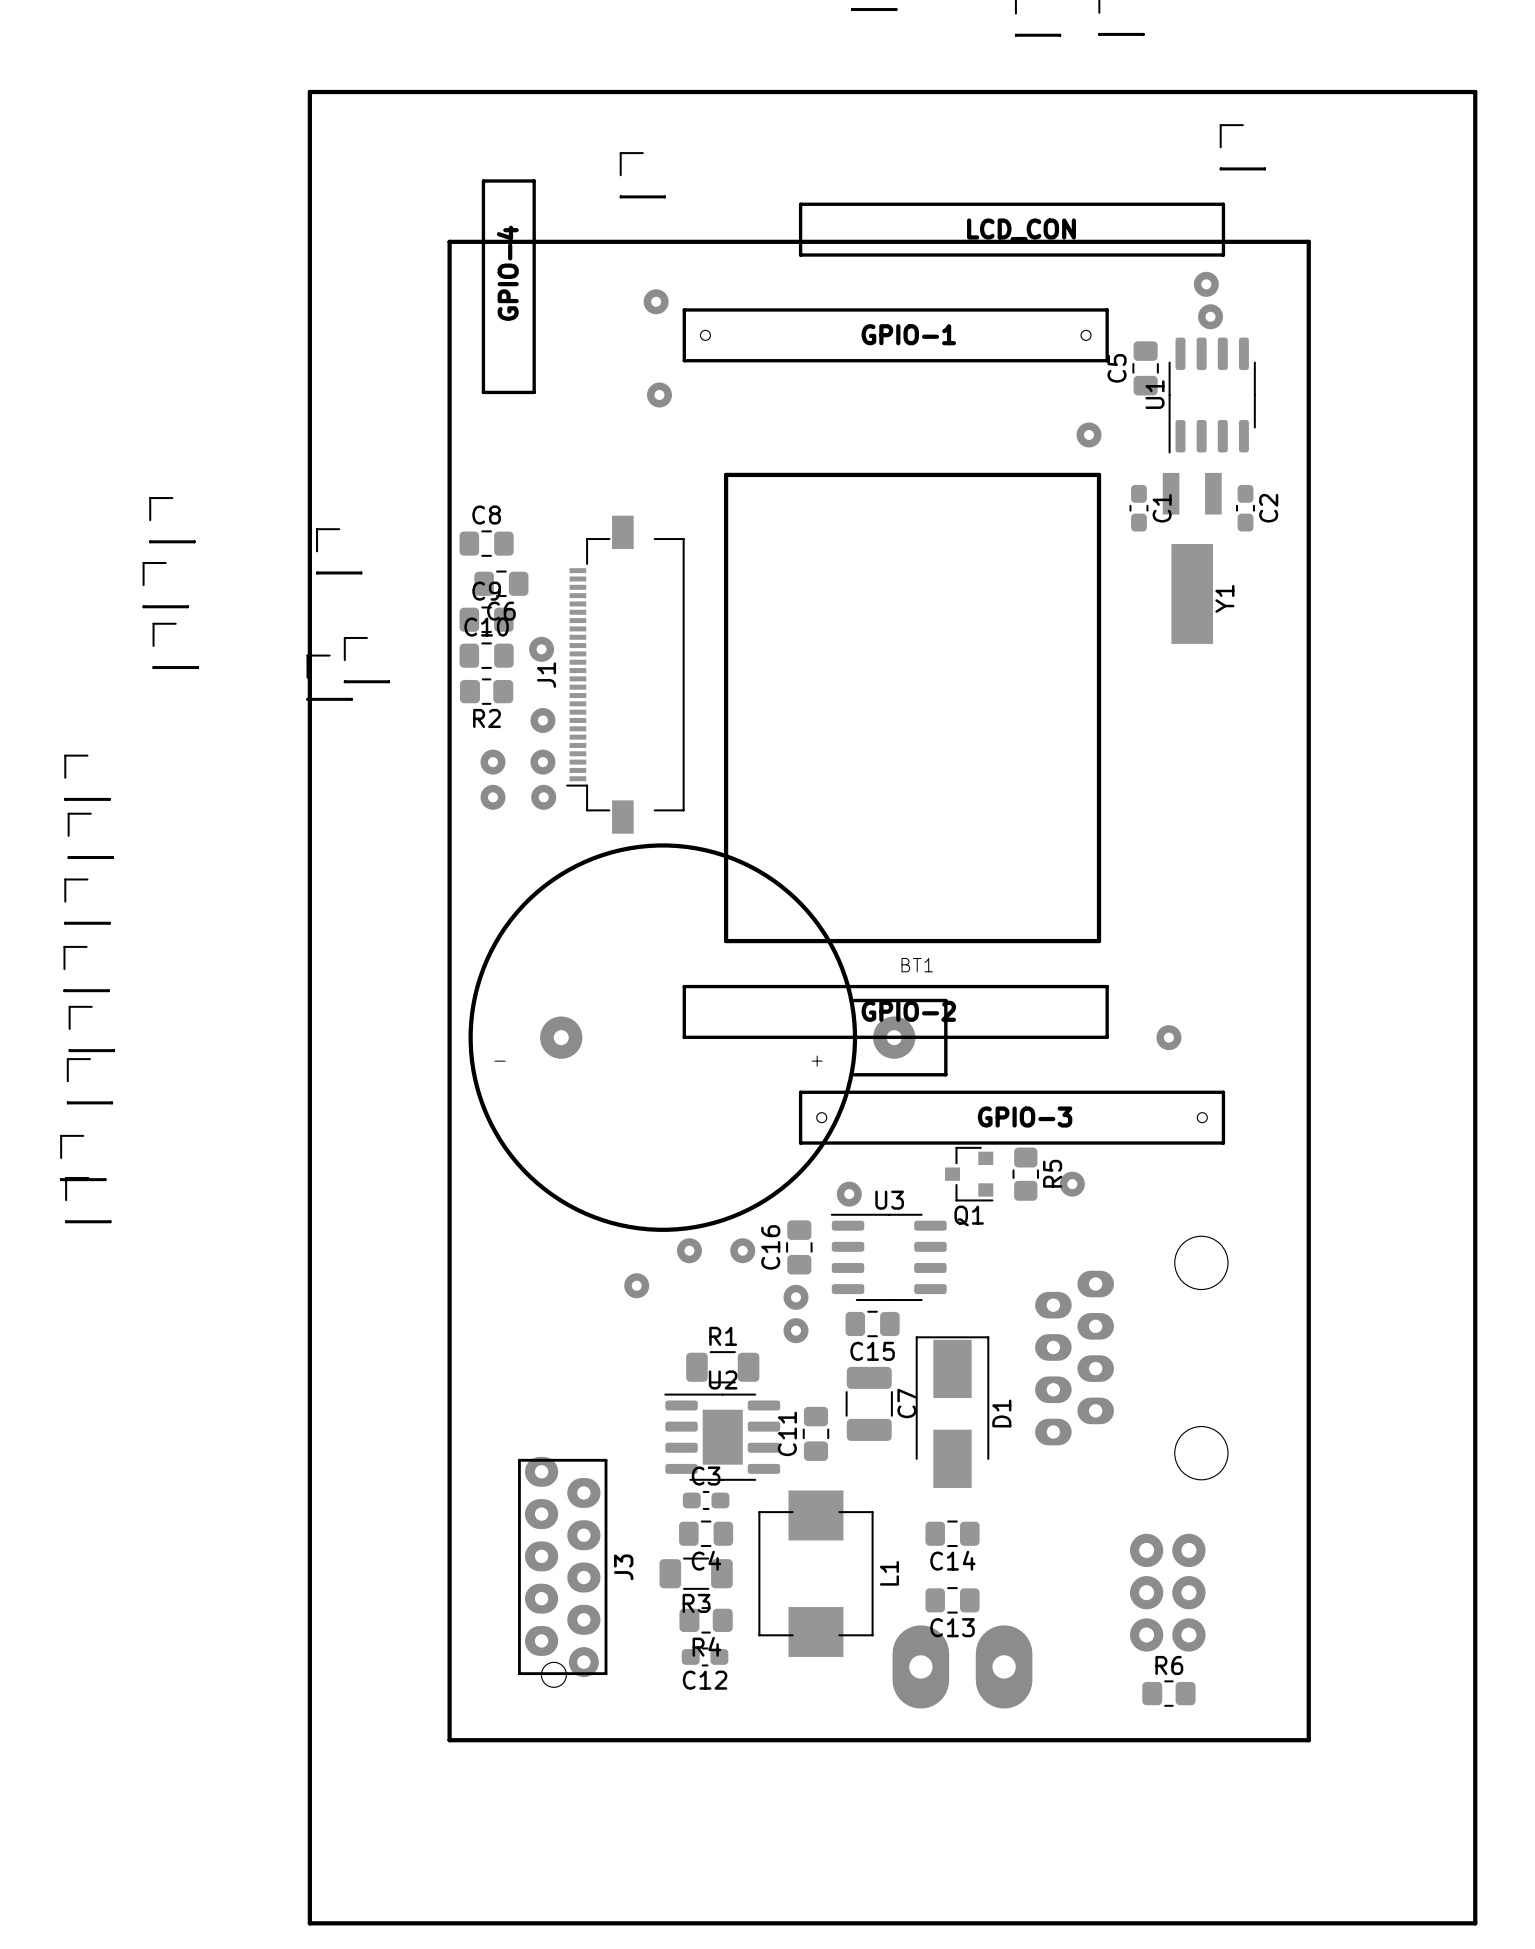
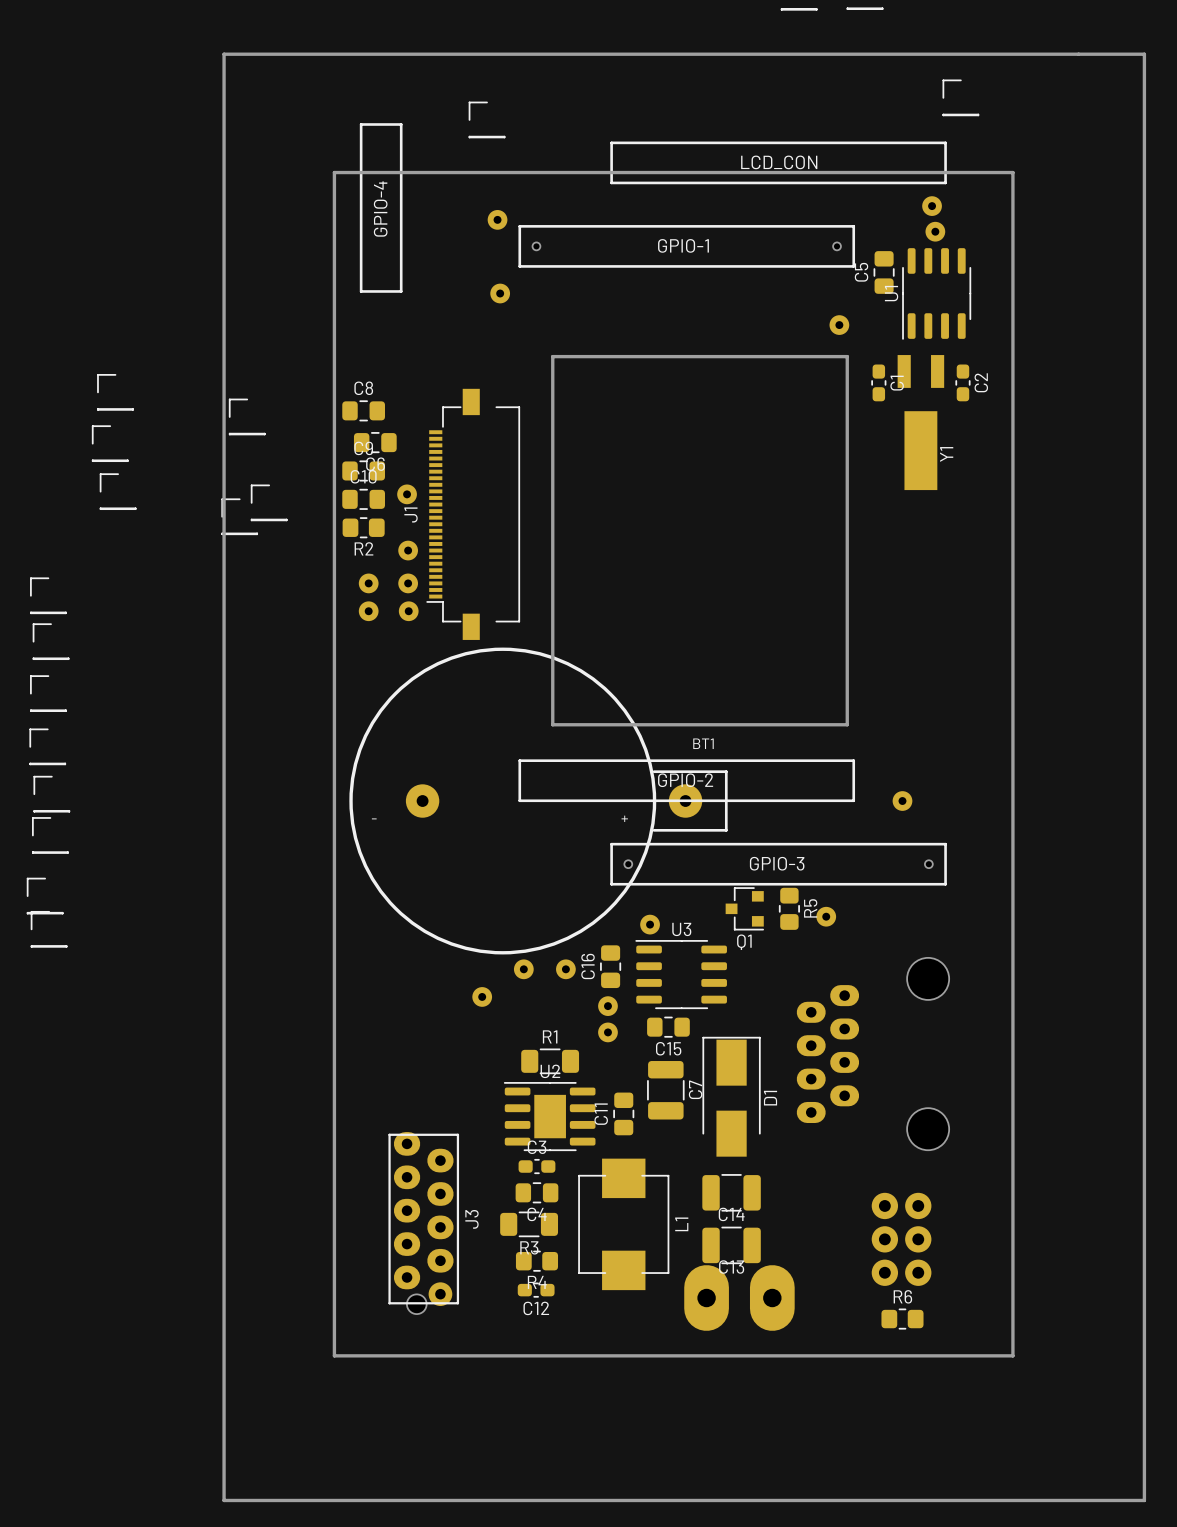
C14 footprint: [925, 1520, 980, 1547] -> [702, 1174, 761, 1212]
C13 footprint: [925, 1587, 980, 1614] -> [702, 1226, 761, 1265]

